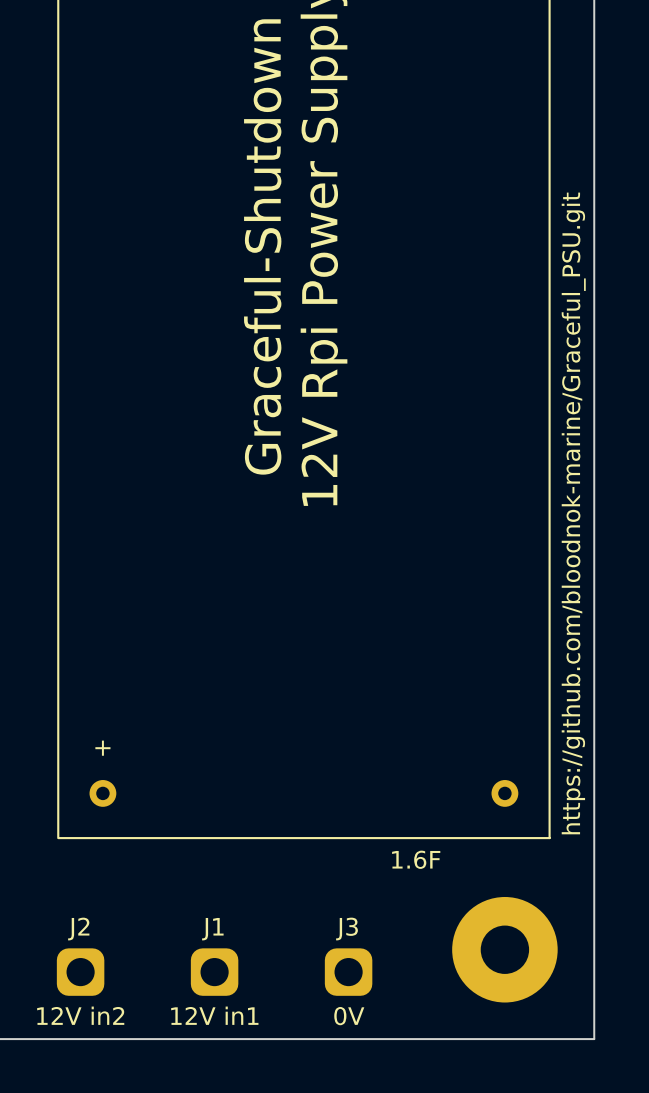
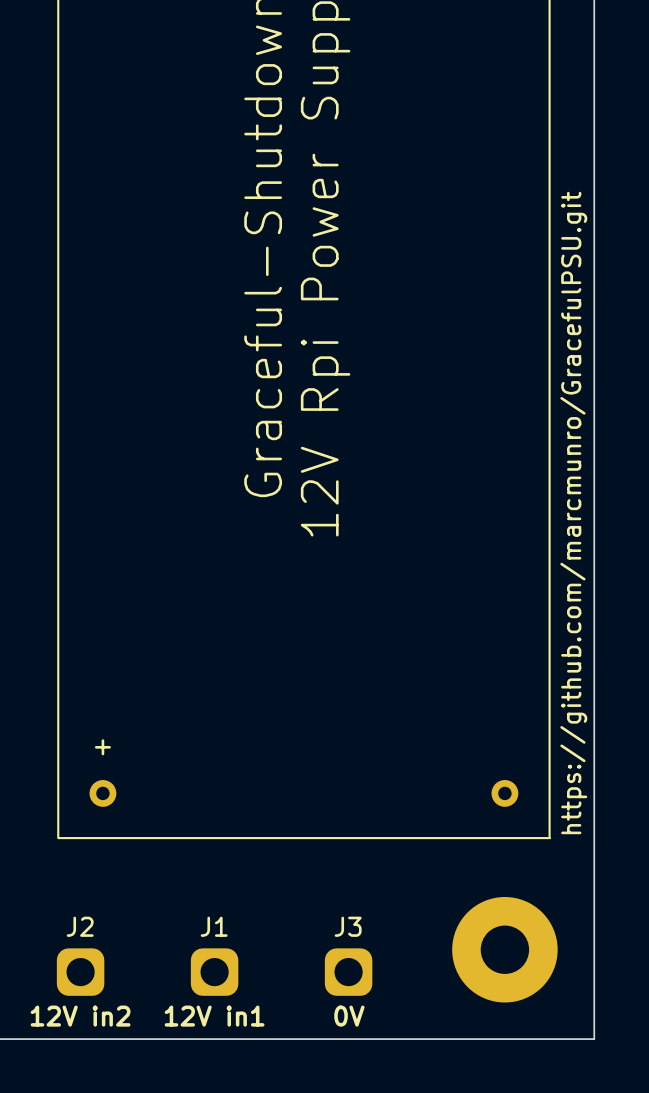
text: https://github.com/bloodnok-marine/Graceful_PSU.git (573, 513) -> https://github.com/marcmunro/GracefulPSU.git (573, 513)
part value: 1.6F (416, 859) -> none

